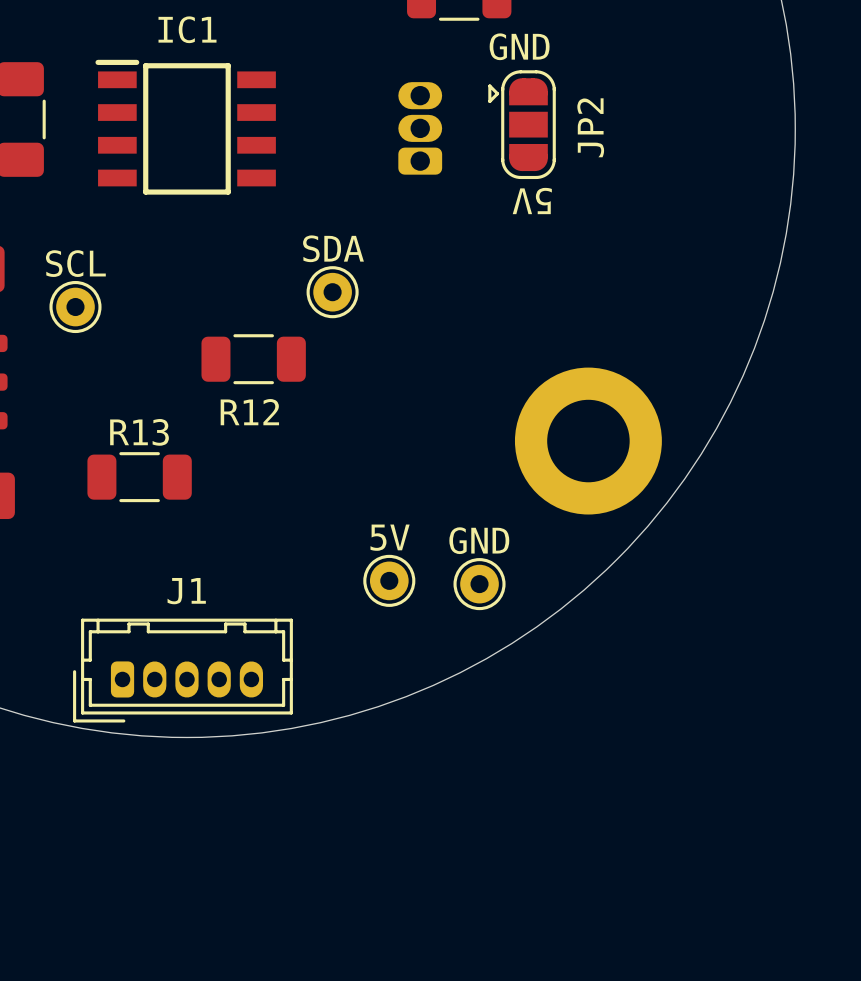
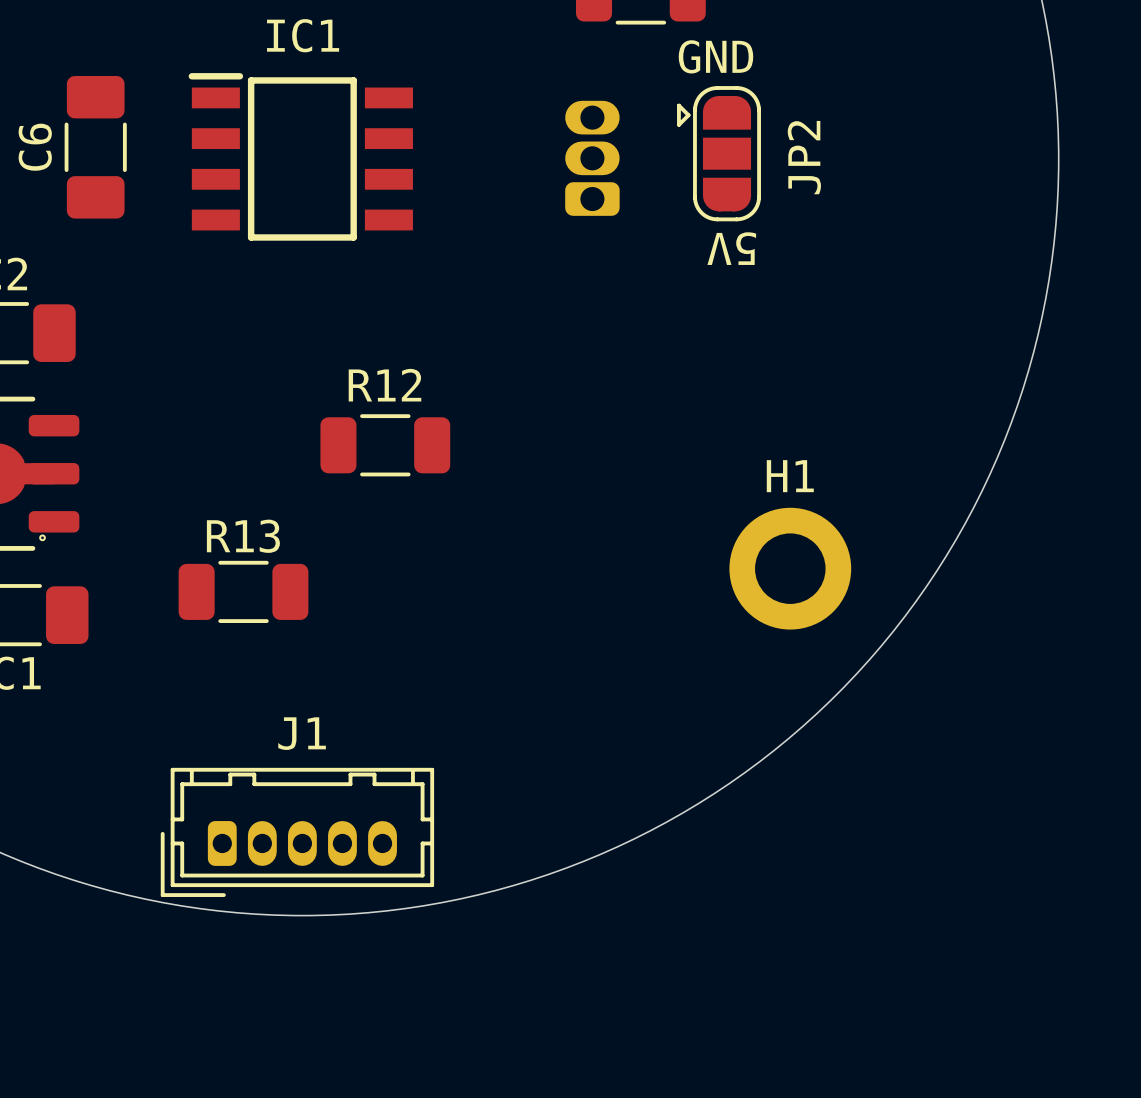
SDA: (332, 292) -> none
SCL: (75, 307) -> none
R12 name position: R12 (249, 412) -> R12 (384, 385)
part: (588, 441) -> none
H1: none -> (790, 568)
5V: (389, 580) -> none
GND: (479, 584) -> none

